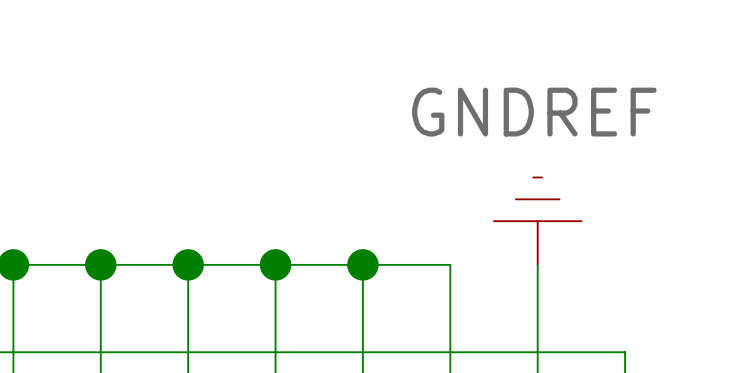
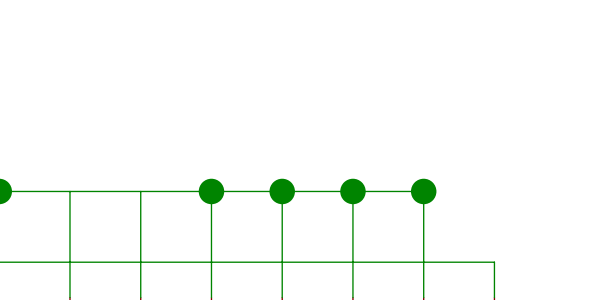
power symbol: GNDREF (537, 221) -> none
junction: (100, 264) -> none
junction: (188, 264) -> none
wire: none -> (352, 191) (423, 191)
junction: none -> (352, 191)
junction: none -> (423, 191)

